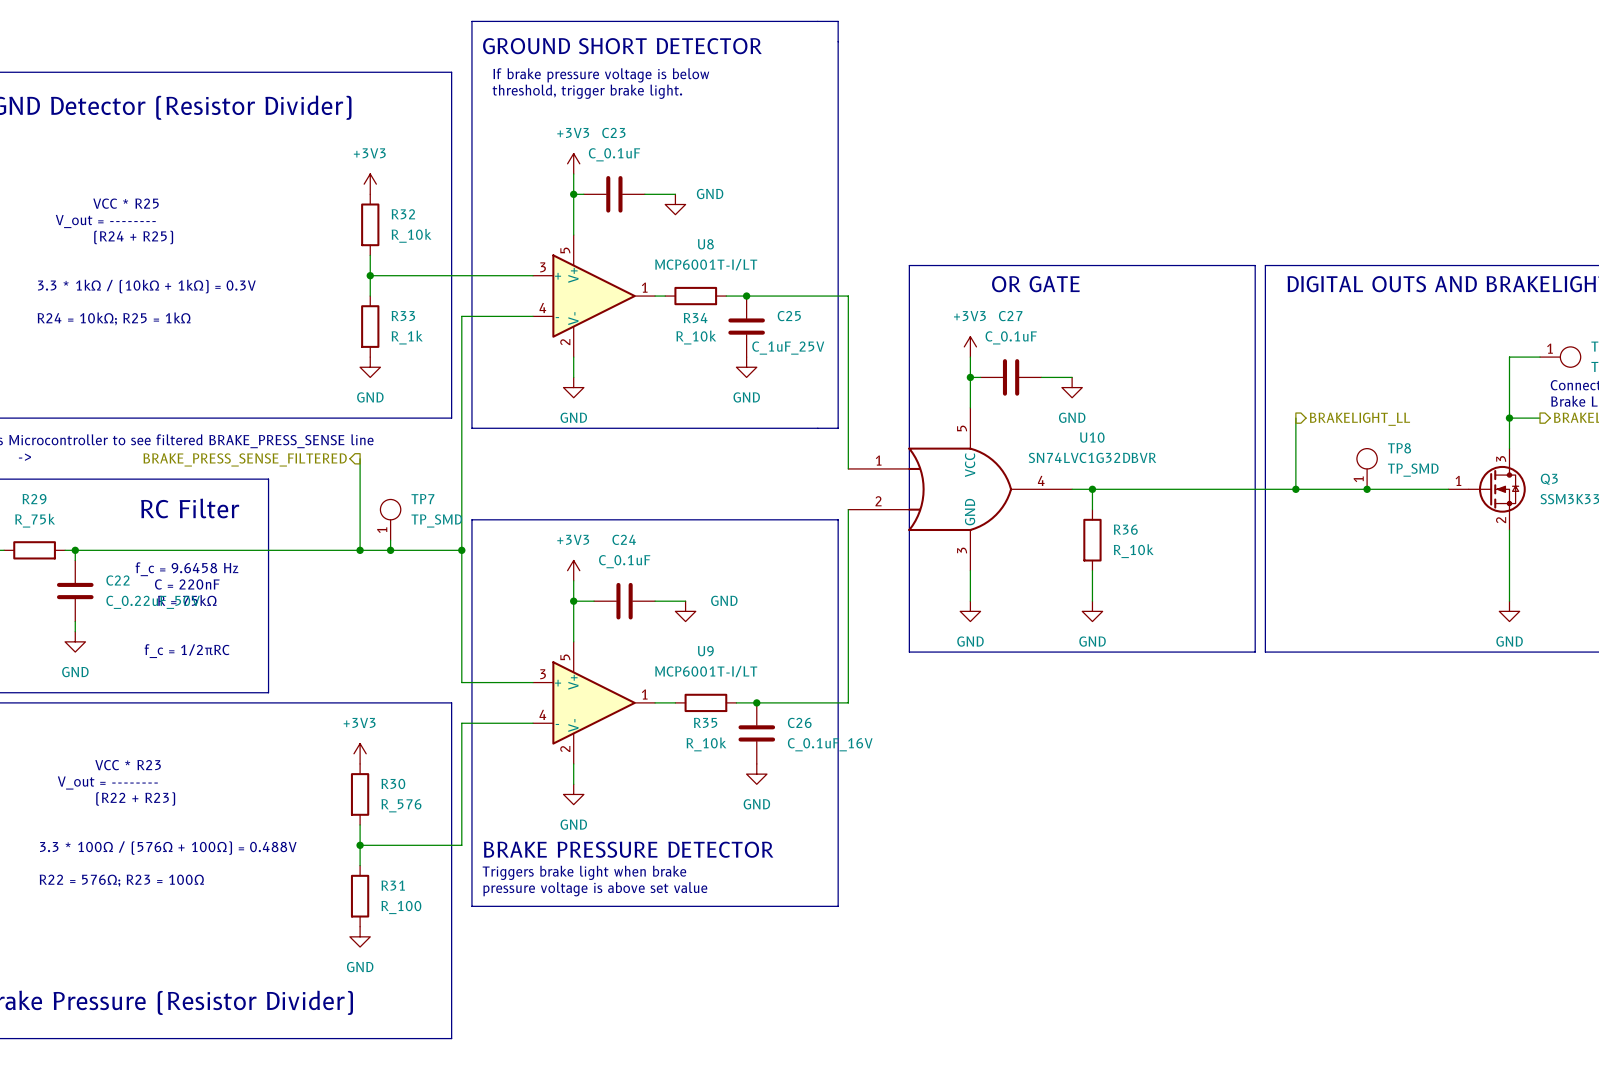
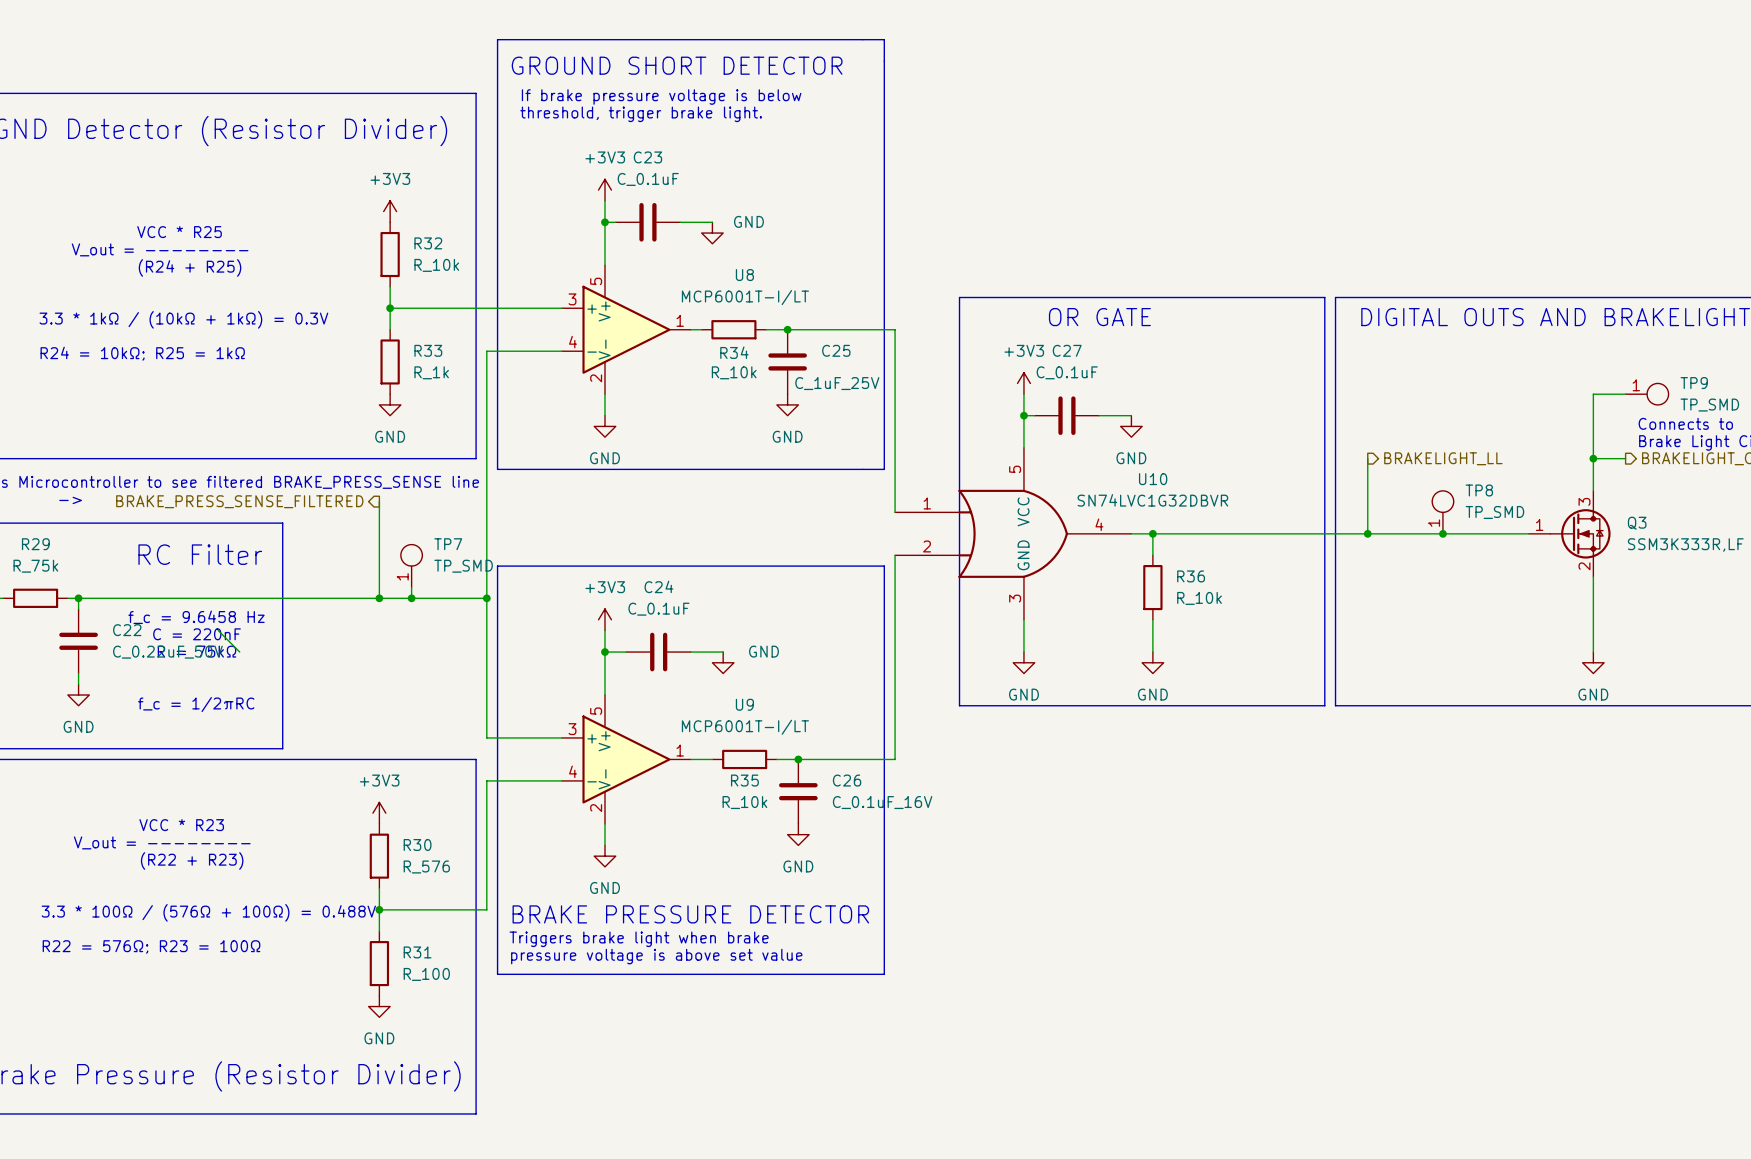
wire: none -> (218, 630) (239, 652)

